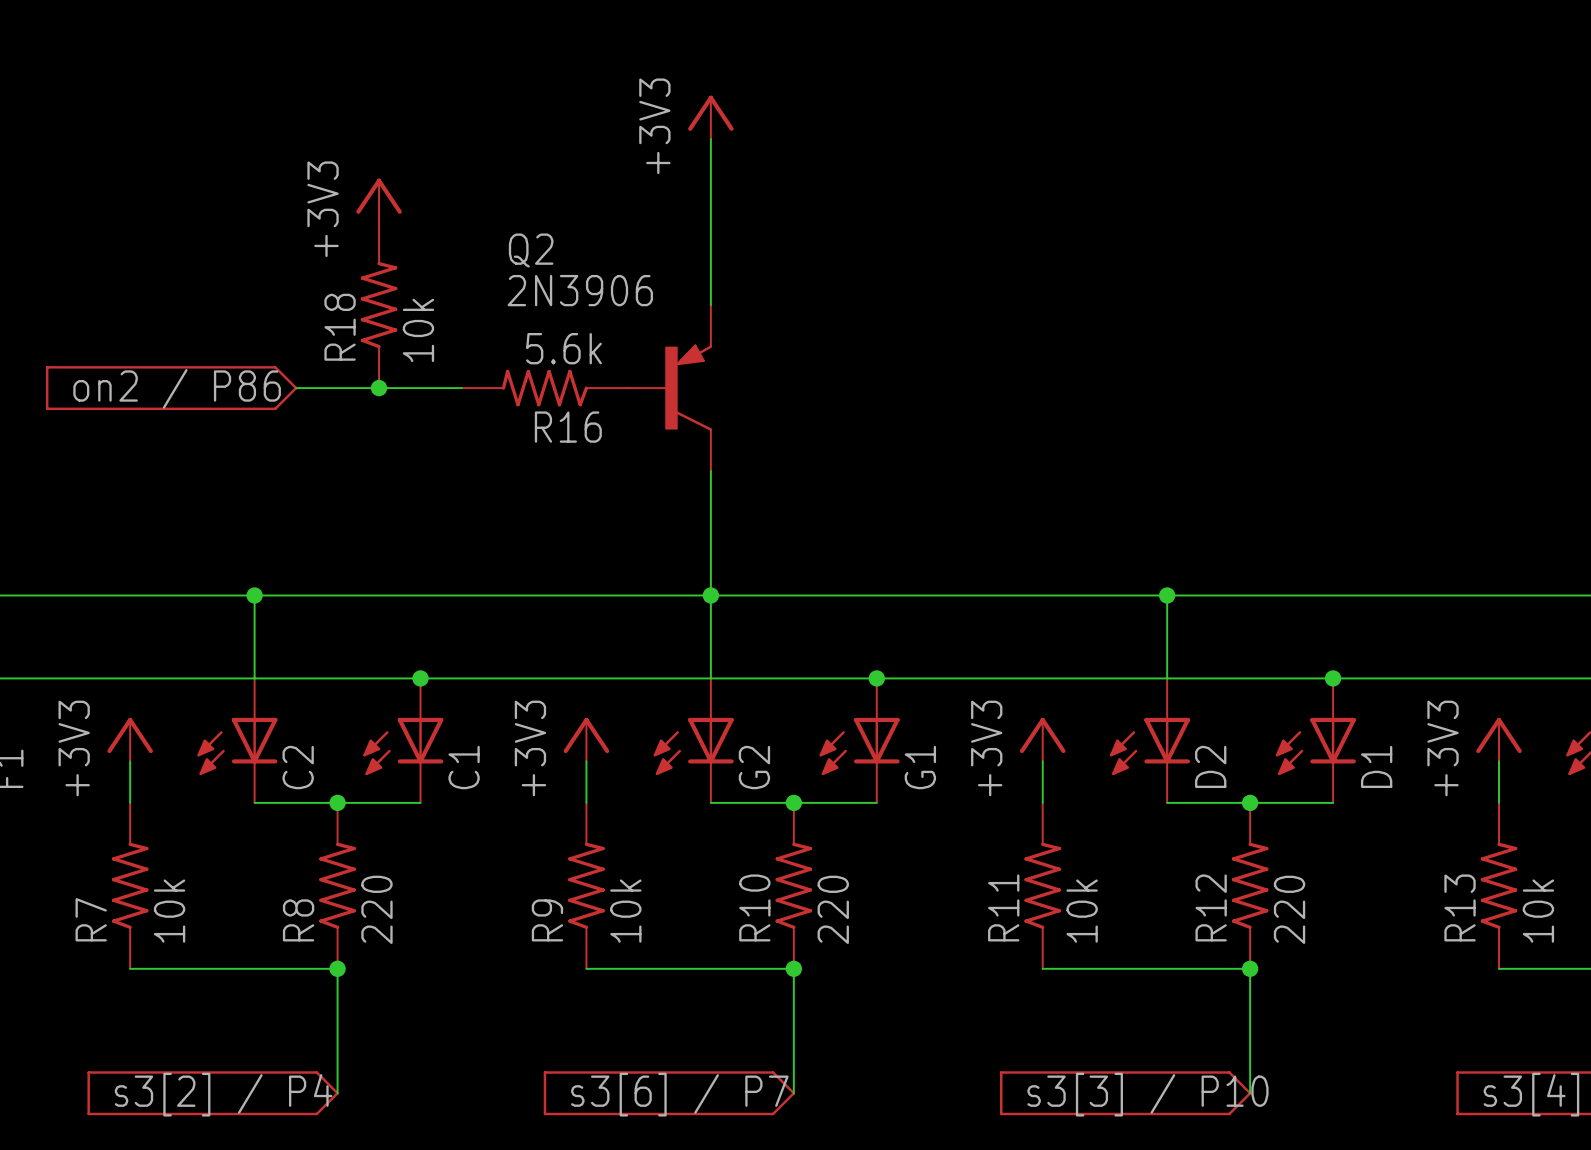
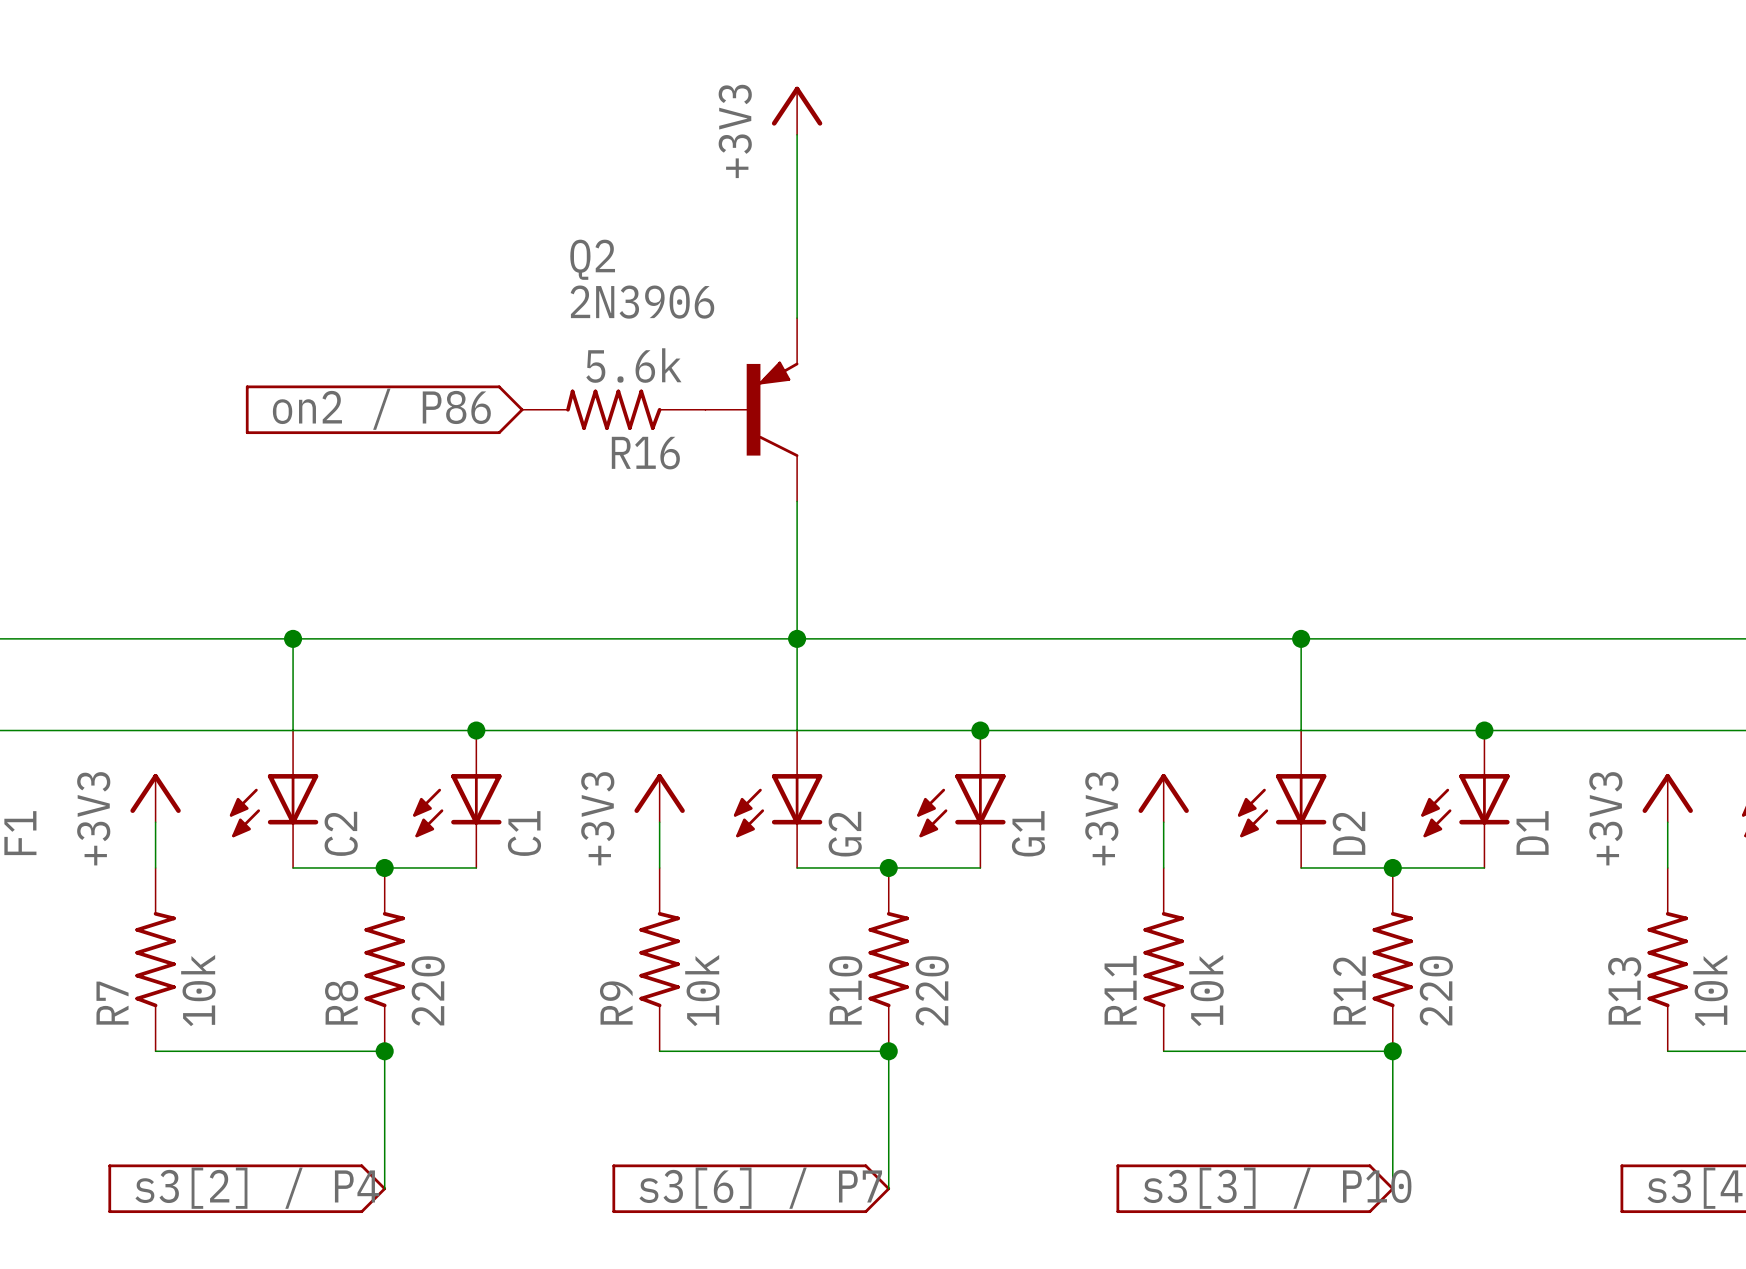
power symbol: +3V3 (379, 200) -> none
R18: 10k (379, 305) -> none
part position: (171, 388) -> (384, 409)
wire: (296, 388) (462, 388) -> none
junction: (379, 388) -> none

